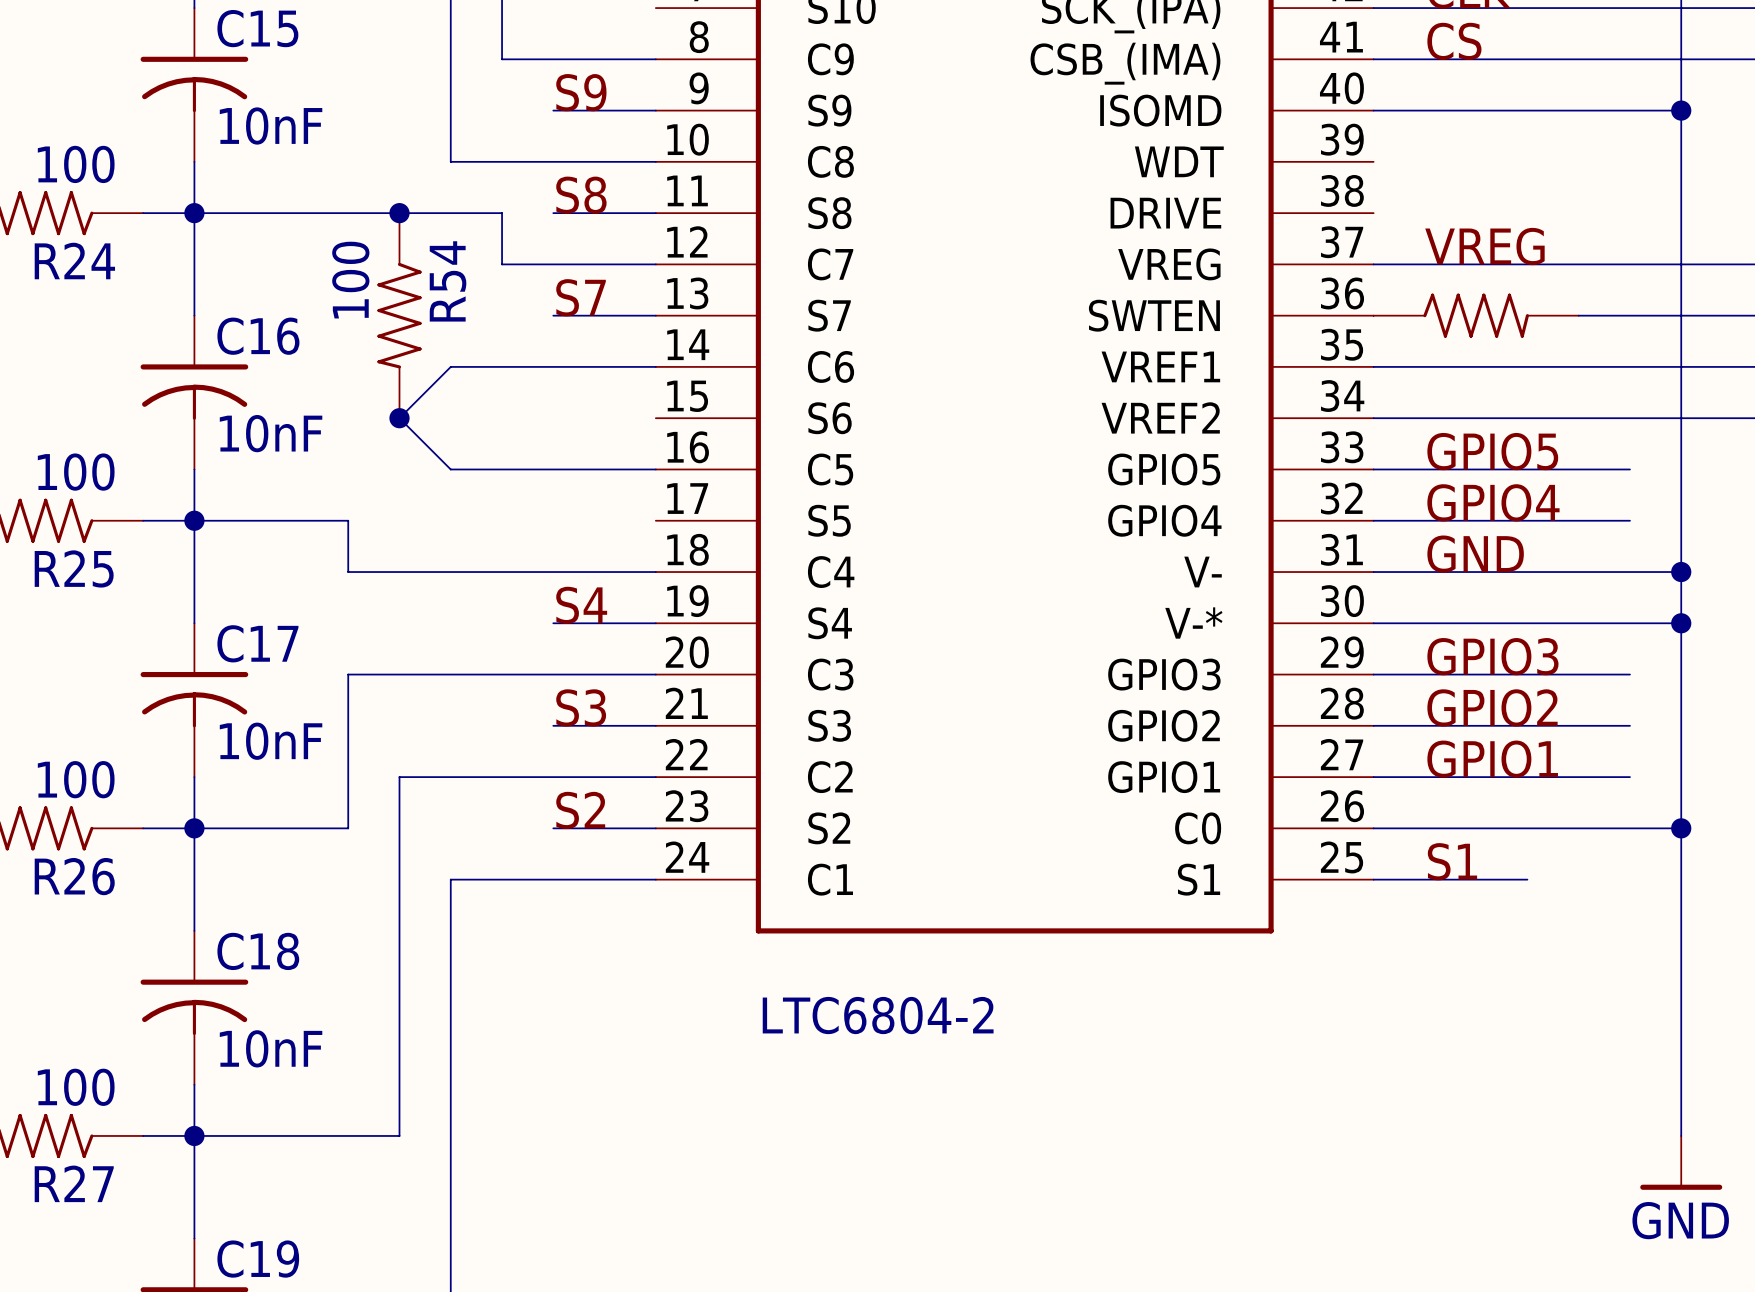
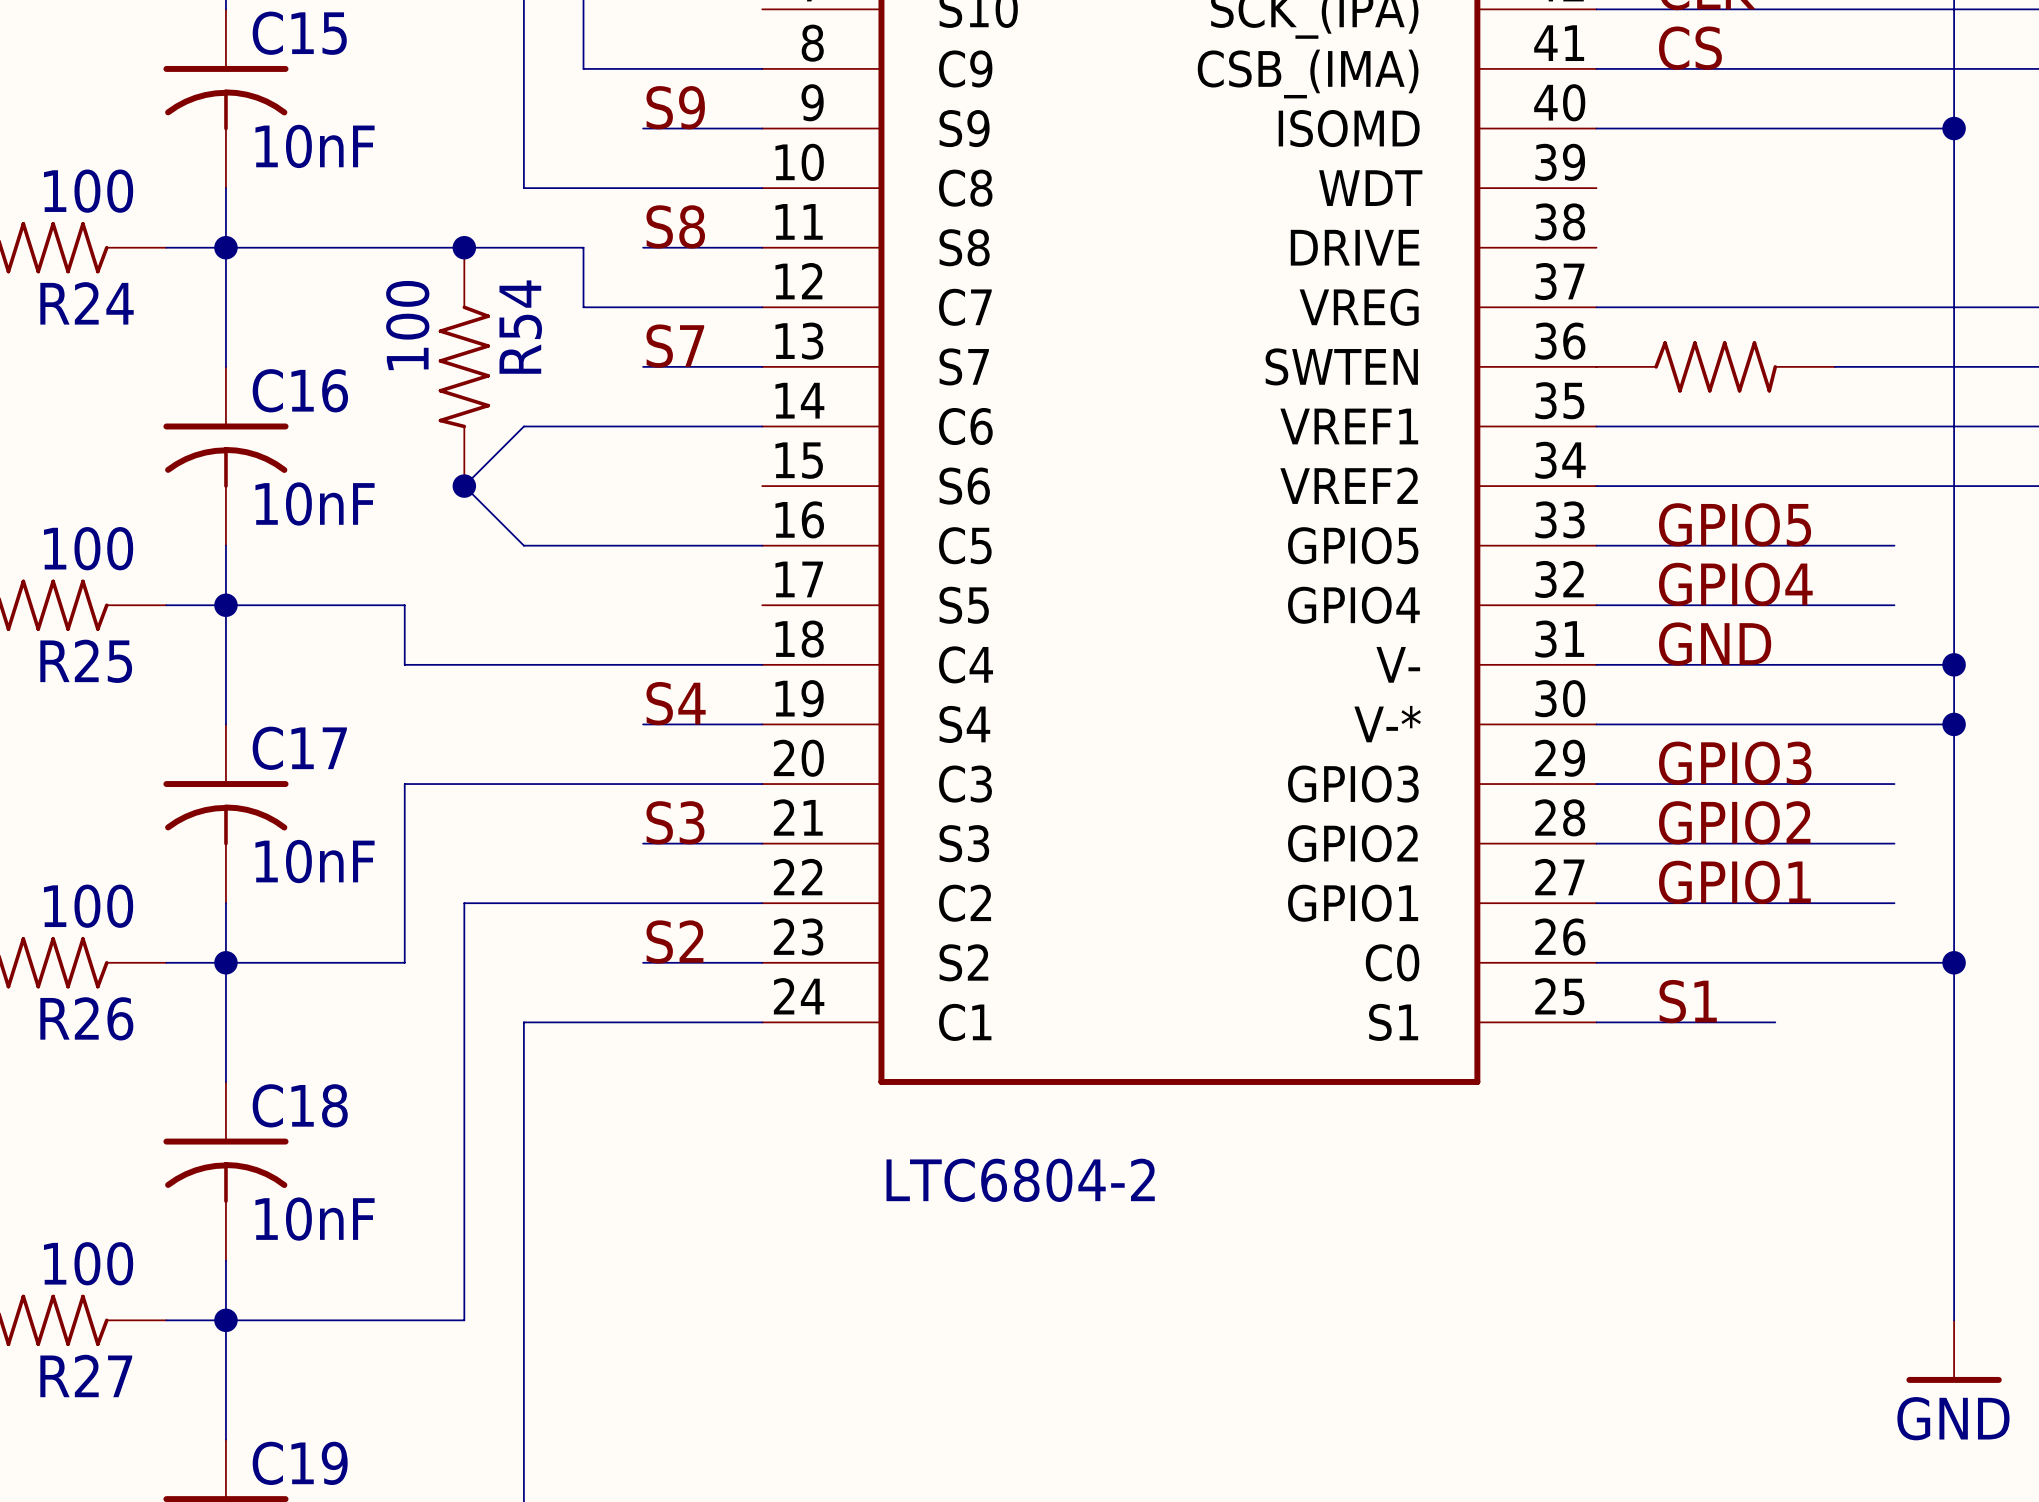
label: VREG (1484, 246) -> none

